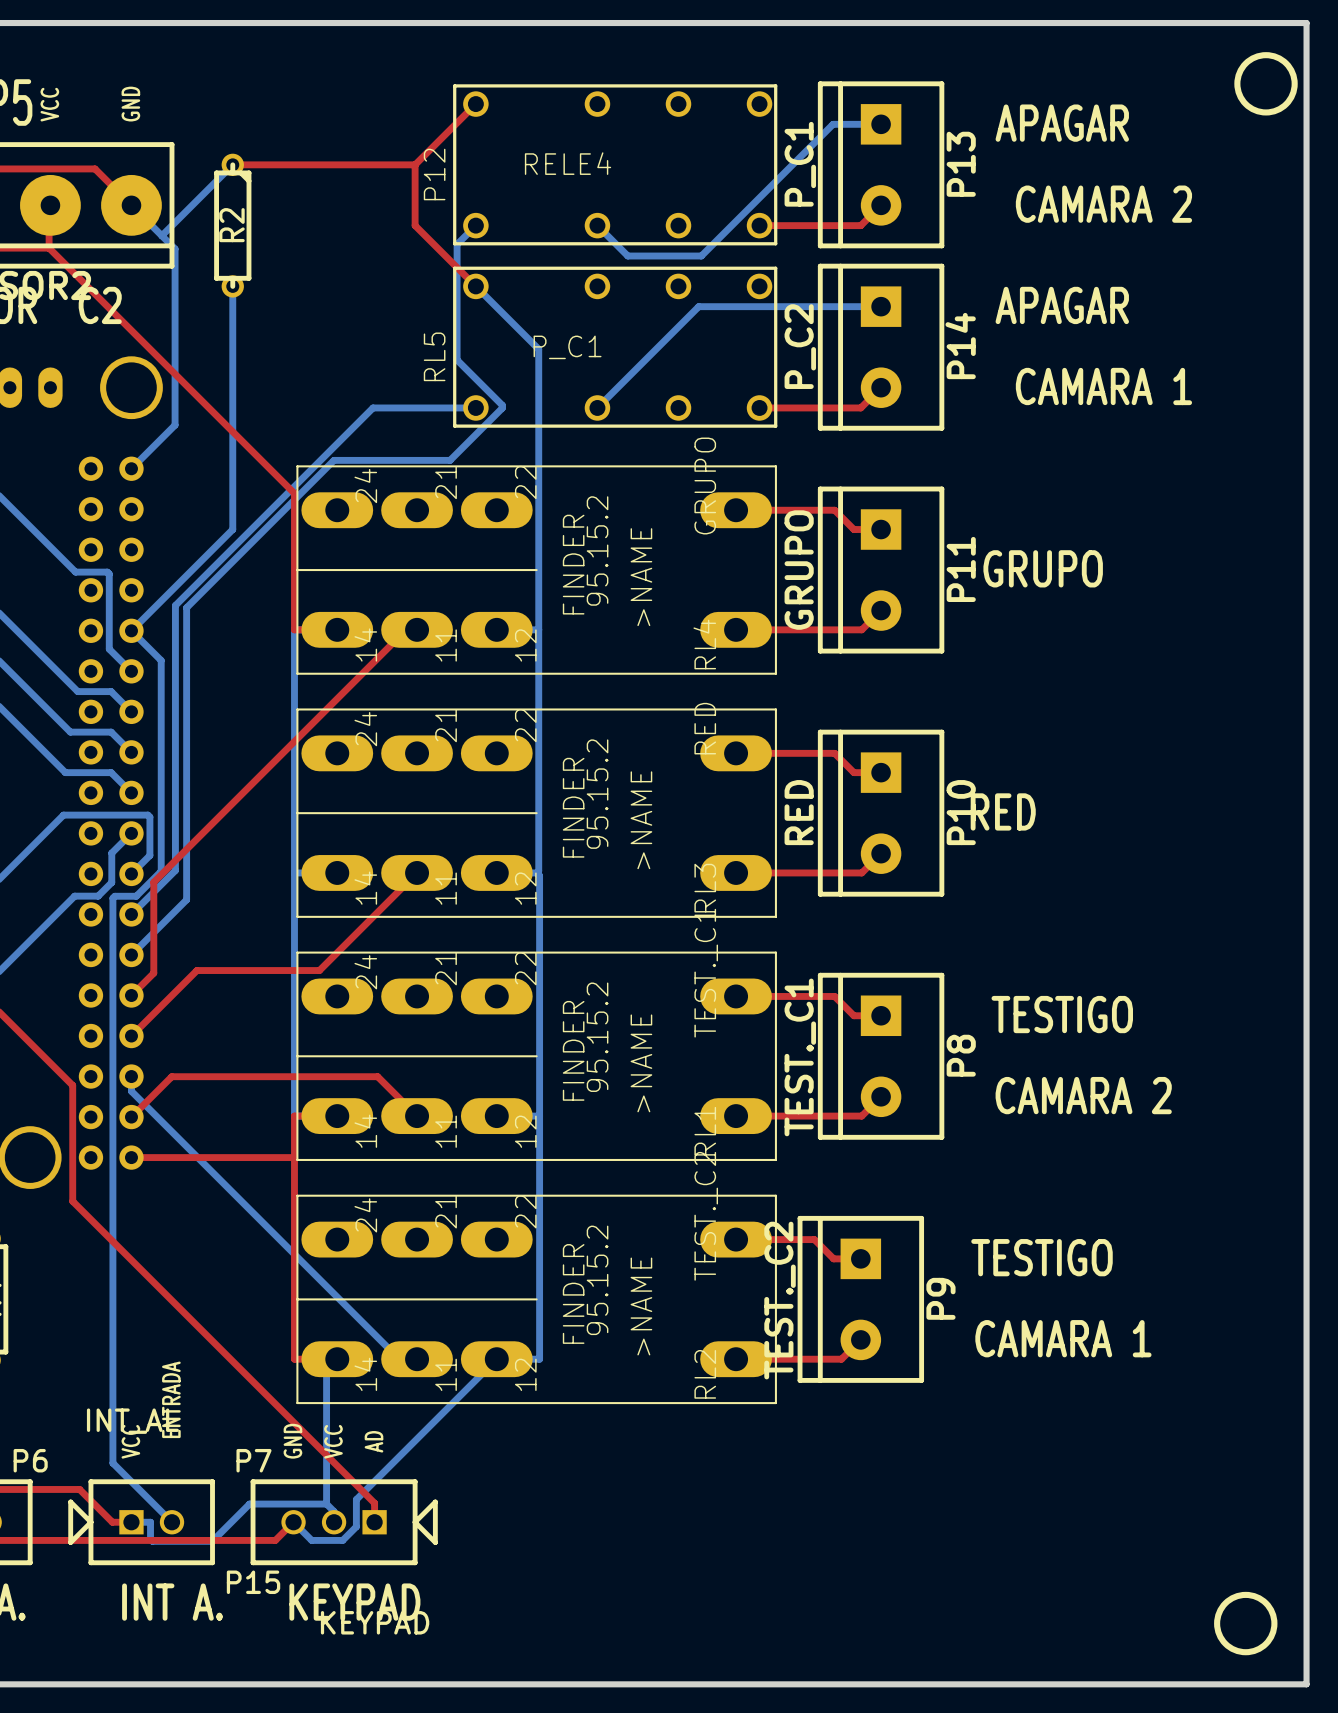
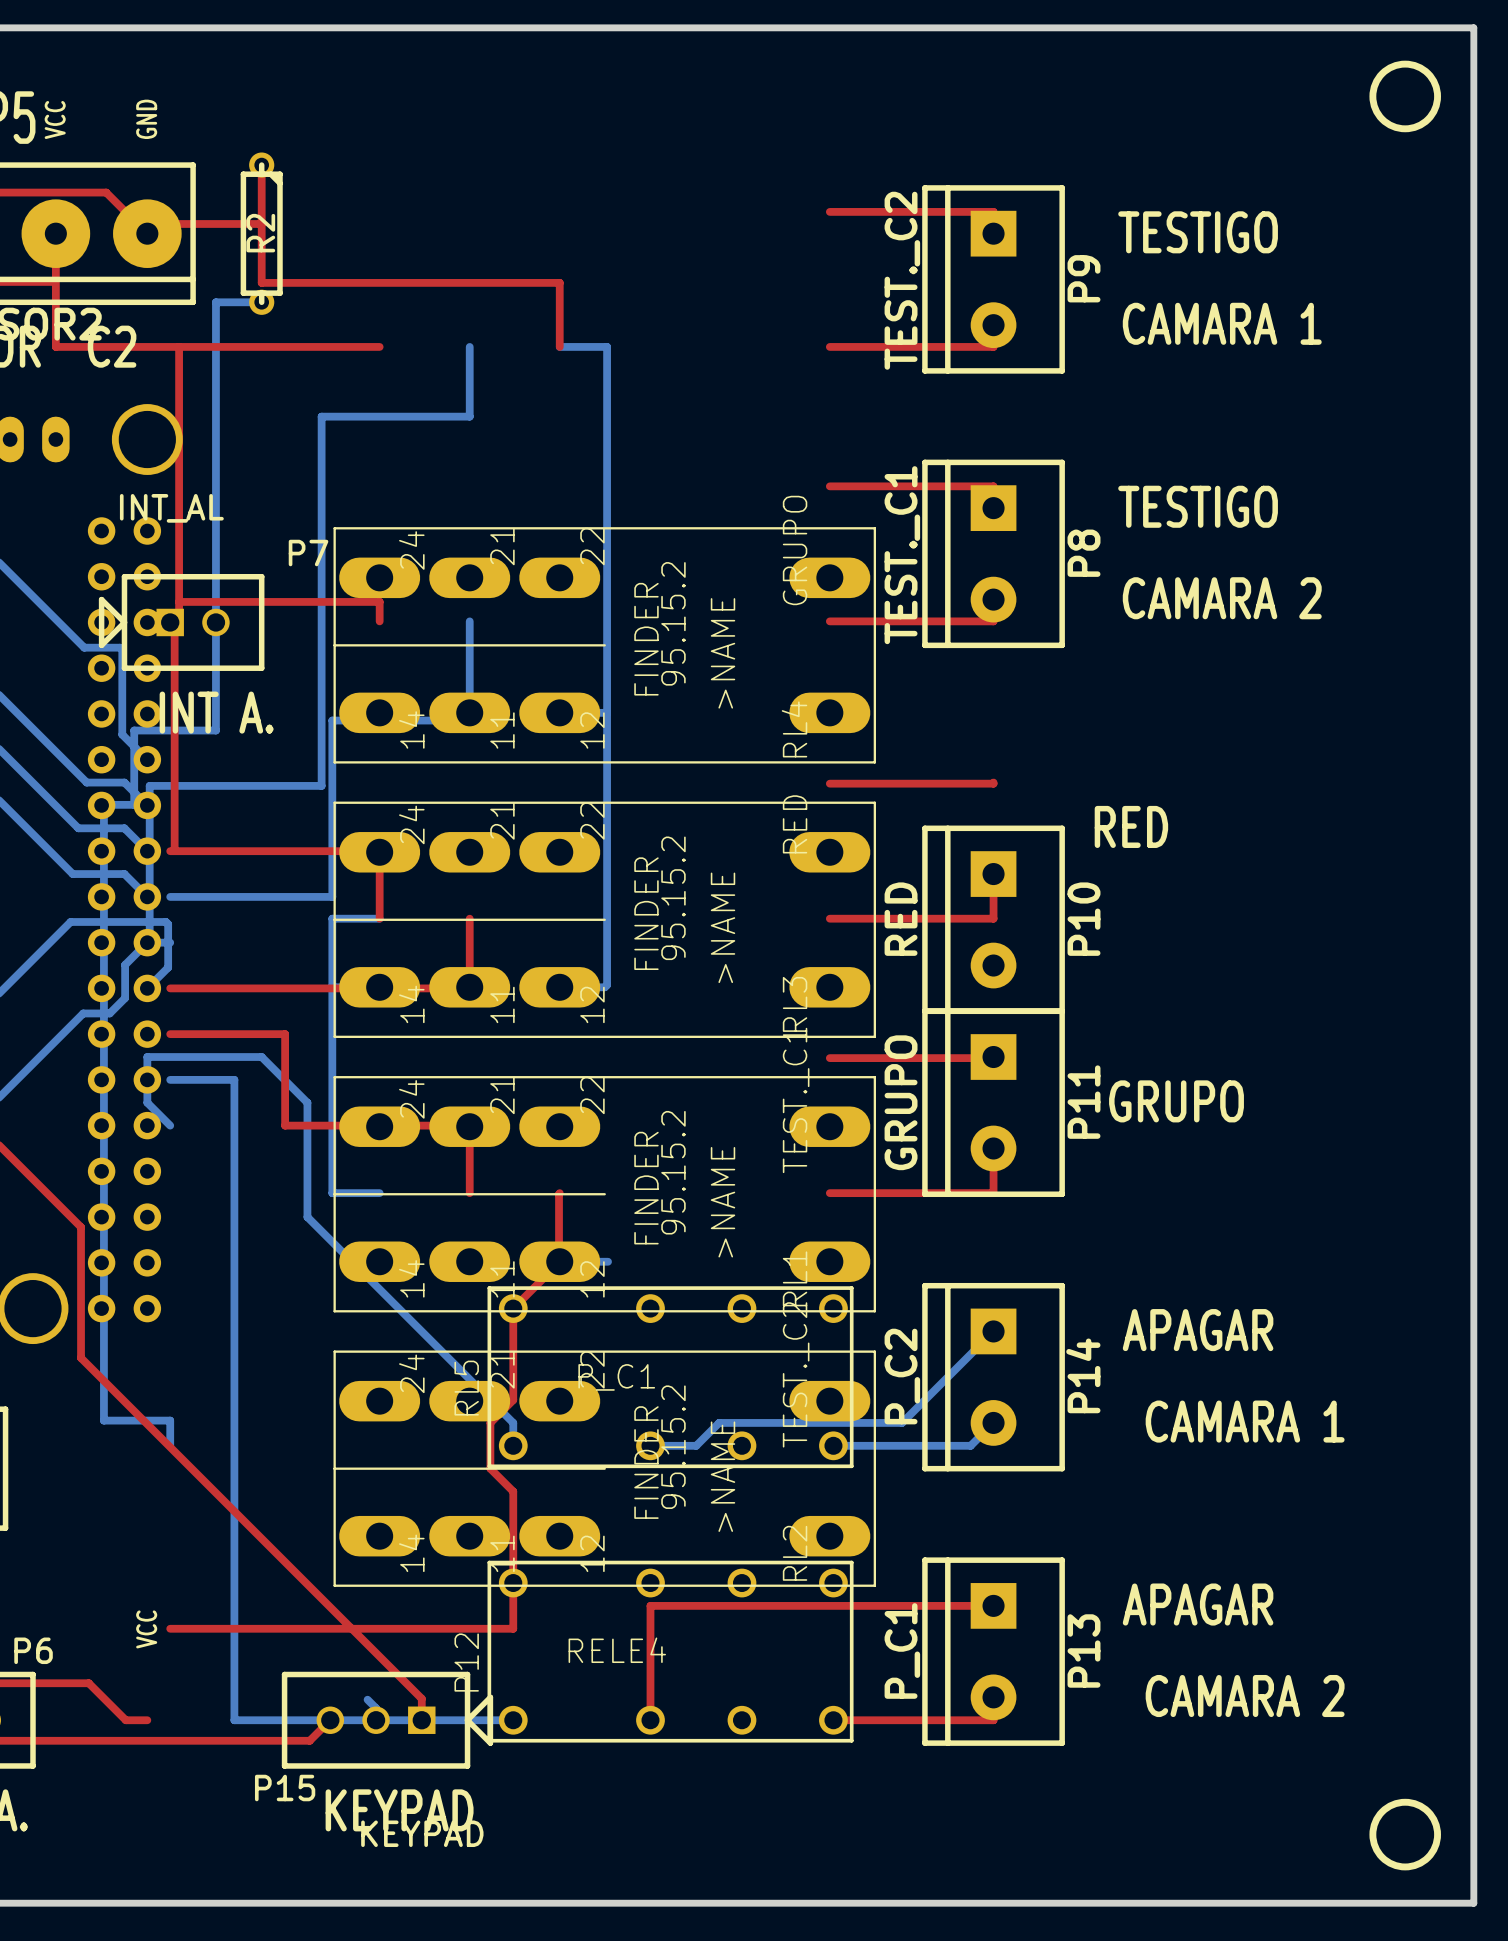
drawing position: (1266, 83) -> (1405, 96)
top track: (475, 104) (415, 164) -> none
text: APAGAR (1062, 123) -> none
bottom track: (881, 124) (833, 124) (701, 256) (627, 256) (597, 225) -> none
top track: none -> (261, 165) (261, 282) (559, 282) (559, 346)
top track: (232, 164) (415, 164) -> none
bottom track: (232, 164) (161, 235) -> none
top track: (415, 164) (415, 225) (475, 286) -> none
P12 position: (615, 164) -> (670, 1651)
P13 position: (881, 164) -> (993, 1651)
top track: none -> (147, 223) (261, 223)
text: none -> TESTIGO (1198, 232)
text: CAMARA 2 (1103, 204) -> none
top track: (50, 205) (49, 248) (294, 493) (294, 629) (337, 629) -> (55, 233) (55, 346) (379, 346)
bottom track: (131, 205) (175, 248) (175, 425) (131, 468) -> none
top track: (881, 205) (860, 225) (759, 225) -> (993, 233) (993, 211) (829, 211)
R2 position: (232, 225) -> (261, 233)
bottom track: (475, 225) (457, 244) (457, 360) (502, 405) (502, 408) (450, 460) (333, 460) (186, 607) (186, 899) (131, 954) -> none
bottom track: none -> (261, 302) (215, 302) (215, 730) (134, 730) (134, 804) (103, 804) (103, 1420) (170, 1420) (170, 1445)
bottom track: (232, 286) (232, 529) (131, 630) (161, 660) (161, 871) (136, 896) (114, 896) (112, 898) (112, 1463) (171, 1522) -> none
bottom track: (475, 286) (538, 349) -> (559, 346) (607, 346) (607, 396)
top track: none -> (993, 325) (993, 346) (829, 346)
top track: none -> (179, 346) (179, 622) (170, 622)
bottom track: none -> (469, 346) (469, 416) (321, 416) (321, 785) (149, 785) (149, 942) (170, 942)
text: APAGAR (1062, 305) -> none
bottom track: (881, 306) (698, 306) (597, 407) -> none
RL5 position: (615, 347) -> (670, 1377)
P14 position: (881, 347) -> (993, 1377)
text position: CAMARA 1 (1103, 386) -> CAMARA 1 (1222, 323)
top track: (881, 387) (860, 407) (759, 407) -> none
bottom track: (475, 407) (373, 407) (175, 605) (175, 870) (131, 914) -> none
top track: none -> (829, 486) (993, 486) (993, 508)
text: none -> TESTIGO (1198, 506)
top track: (736, 510) (834, 510) (853, 529) (881, 529) -> (829, 621) (993, 621) (993, 599)
text: none -> CAMARA 2 (1222, 598)
top track: none -> (179, 601) (379, 601) (379, 621)
bottom track: none -> (469, 621) (469, 720) (332, 720) (332, 896) (170, 896)
top track: none -> (174, 622) (174, 851)
text: GRUPO (1043, 568) -> none
P11 position: (881, 570) -> (993, 1102)
top track: (881, 610) (861, 629) (736, 629) -> none
text: none -> INT A. (216, 712)
bottom track: (337, 629) (294, 629) (294, 1116) (337, 1116) -> none
top track: (417, 629) (406, 629) (153, 882) (153, 973) (131, 995) -> none
top track: none -> (993, 782) (829, 783)
top track: none -> (170, 851) (379, 851) (379, 918)
top track: (736, 753) (834, 753) (853, 772) (881, 772) -> (829, 918) (993, 918) (993, 874)
text position: RED (1003, 811) -> RED (1131, 826)
bottom track: none -> (379, 918) (332, 918) (332, 1193) (379, 1193)
top track: none -> (469, 918) (469, 988) (170, 988)
top track: (881, 853) (861, 872) (736, 872) -> none
top track: (417, 872) (319, 970) (196, 970) (131, 1036) -> none
bottom track: (536, 872) (539, 875) (539, 1359) (496, 1359) (356, 1499) (356, 1526) (342, 1540) (311, 1540) (293, 1522) -> none
top track: none -> (170, 1034) (285, 1034) (285, 1125) (469, 1125) (469, 1193)
top track: none -> (993, 1057) (829, 1058)
bottom track: none -> (170, 1079) (234, 1079) (234, 1720) (513, 1720)
text: none -> GRUPO (1176, 1101)
bottom track: none -> (170, 1125) (147, 1102) (147, 1057) (261, 1057) (307, 1102) (307, 1217) (513, 1422) (513, 1445)
top track: (736, 996) (834, 996) (853, 1015) (881, 1015) -> (829, 1193) (993, 1193) (993, 1148)
text: TESTIGO (1062, 1014) -> none
top track: none -> (559, 1193) (559, 1262) (513, 1308) (513, 1400) (490, 1422) (490, 1468) (513, 1491) (513, 1628) (170, 1628)
P8 position: (881, 1056) -> (993, 553)
bottom track: (131, 1076) (131, 1091) (399, 1359) (417, 1359) -> none
text: CAMARA 2 (1083, 1095) -> none
top track: (881, 1096) (861, 1116) (736, 1116) -> none
top track: (337, 1116) (294, 1116) (294, 1359) (337, 1359) -> none
top track: (417, 1116) (377, 1076) (171, 1076) (131, 1117) -> none
top track: (131, 1157) (294, 1157) -> none
text: none -> APAGAR (1198, 1330)
bottom track: none -> (993, 1331) (902, 1422) (719, 1422) (696, 1445) (650, 1445)
top track: (736, 1239) (814, 1239) (833, 1258) (860, 1258) -> none
text: TESTIGO (1042, 1257) -> none
bottom track: none -> (993, 1422) (970, 1445) (833, 1445)
P9 position: (860, 1299) -> (993, 279)
text position: CAMARA 1 (1063, 1338) -> CAMARA 1 (1245, 1421)
top track: (860, 1339) (841, 1359) (736, 1359) -> none
bottom track: (337, 1359) (326, 1359) (326, 1504) (249, 1504) (212, 1541) (152, 1541) (150, 1539) (150, 1522) (131, 1522) -> none
text: ENTRADA (171, 1399) -> none
text: none -> APAGAR (1198, 1604)
top track: none -> (993, 1605) (650, 1605) (650, 1720)
text: GND (292, 1441) -> none
text: VCC (333, 1441) -> none
text: AD (373, 1441) -> none
text: none -> CAMARA 2 (1245, 1696)
top track: none -> (993, 1697) (993, 1720) (833, 1720)
P7 position: (141, 1522) -> (181, 622)
text: INT A. (172, 1602) -> none

